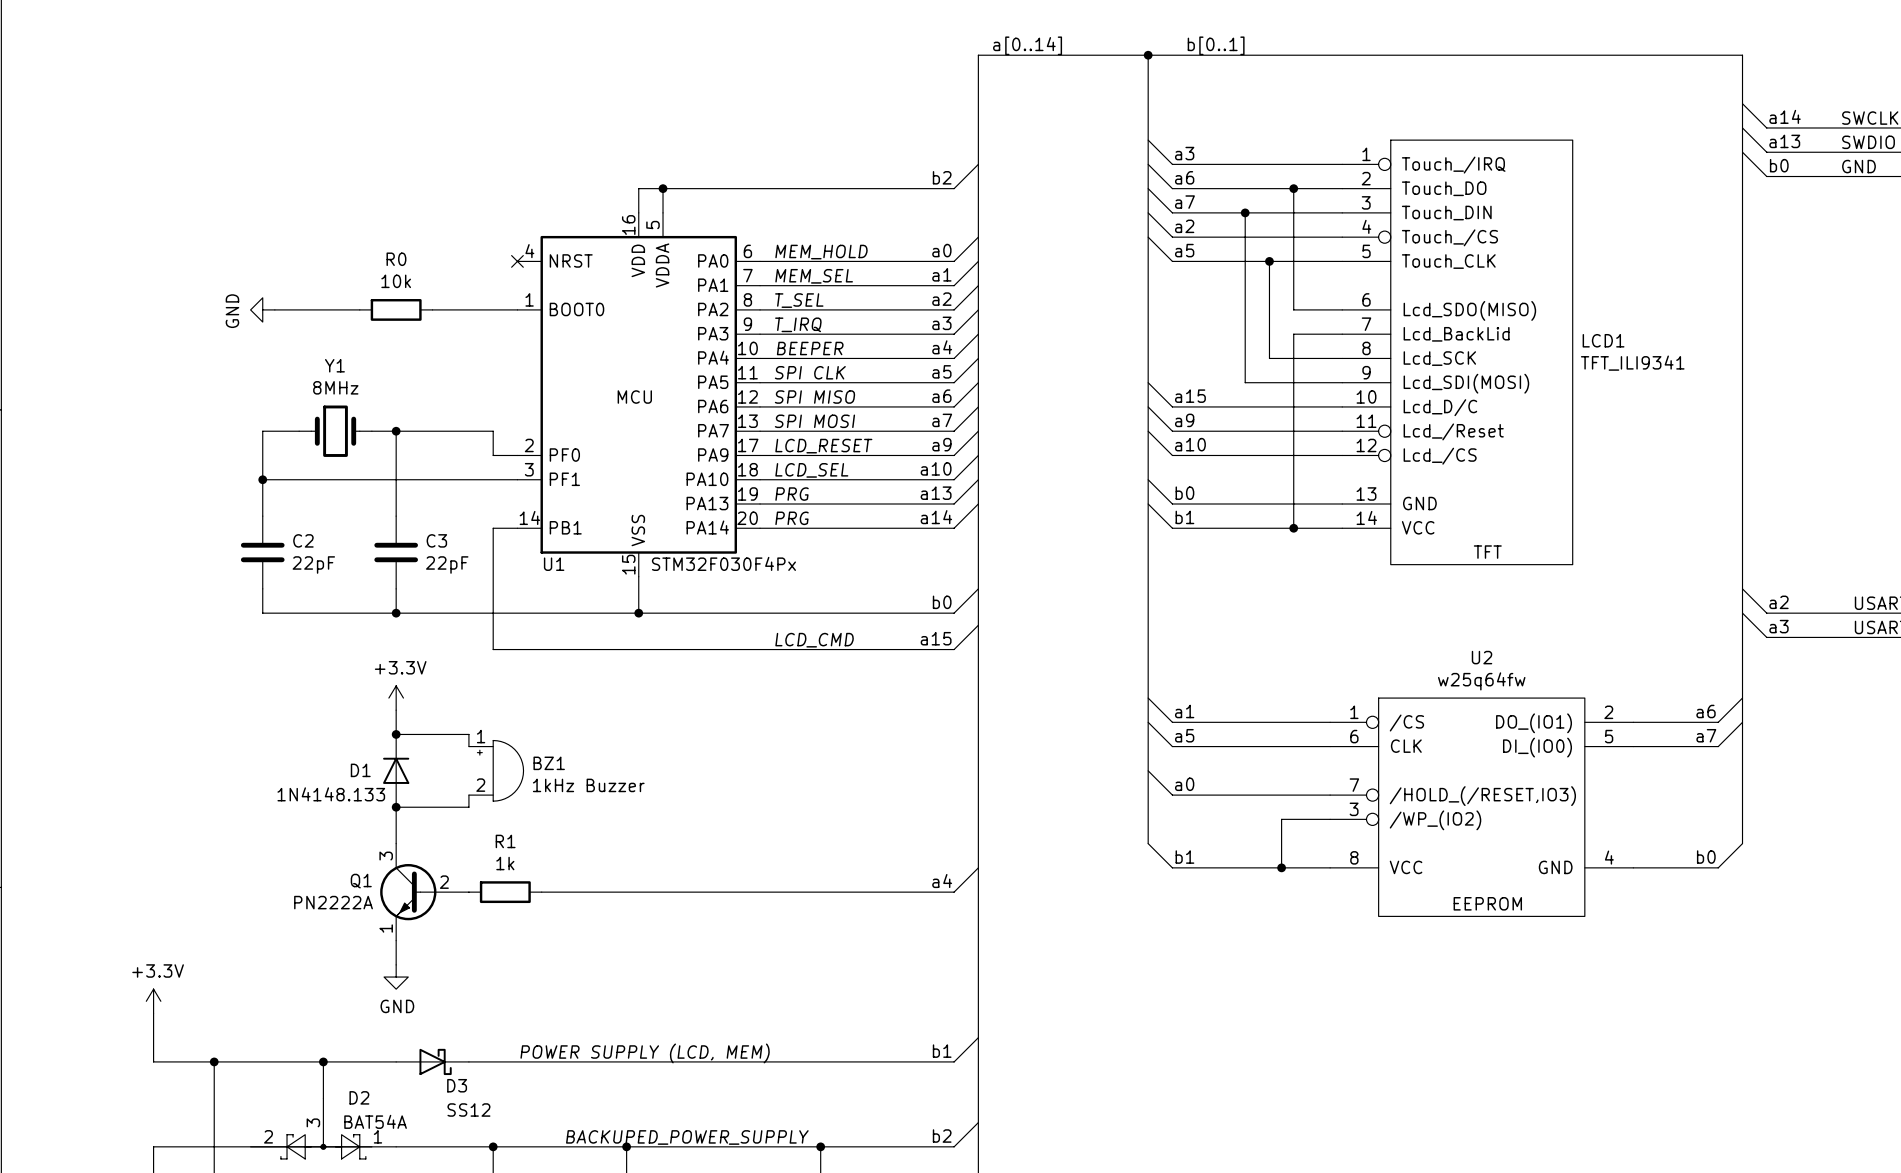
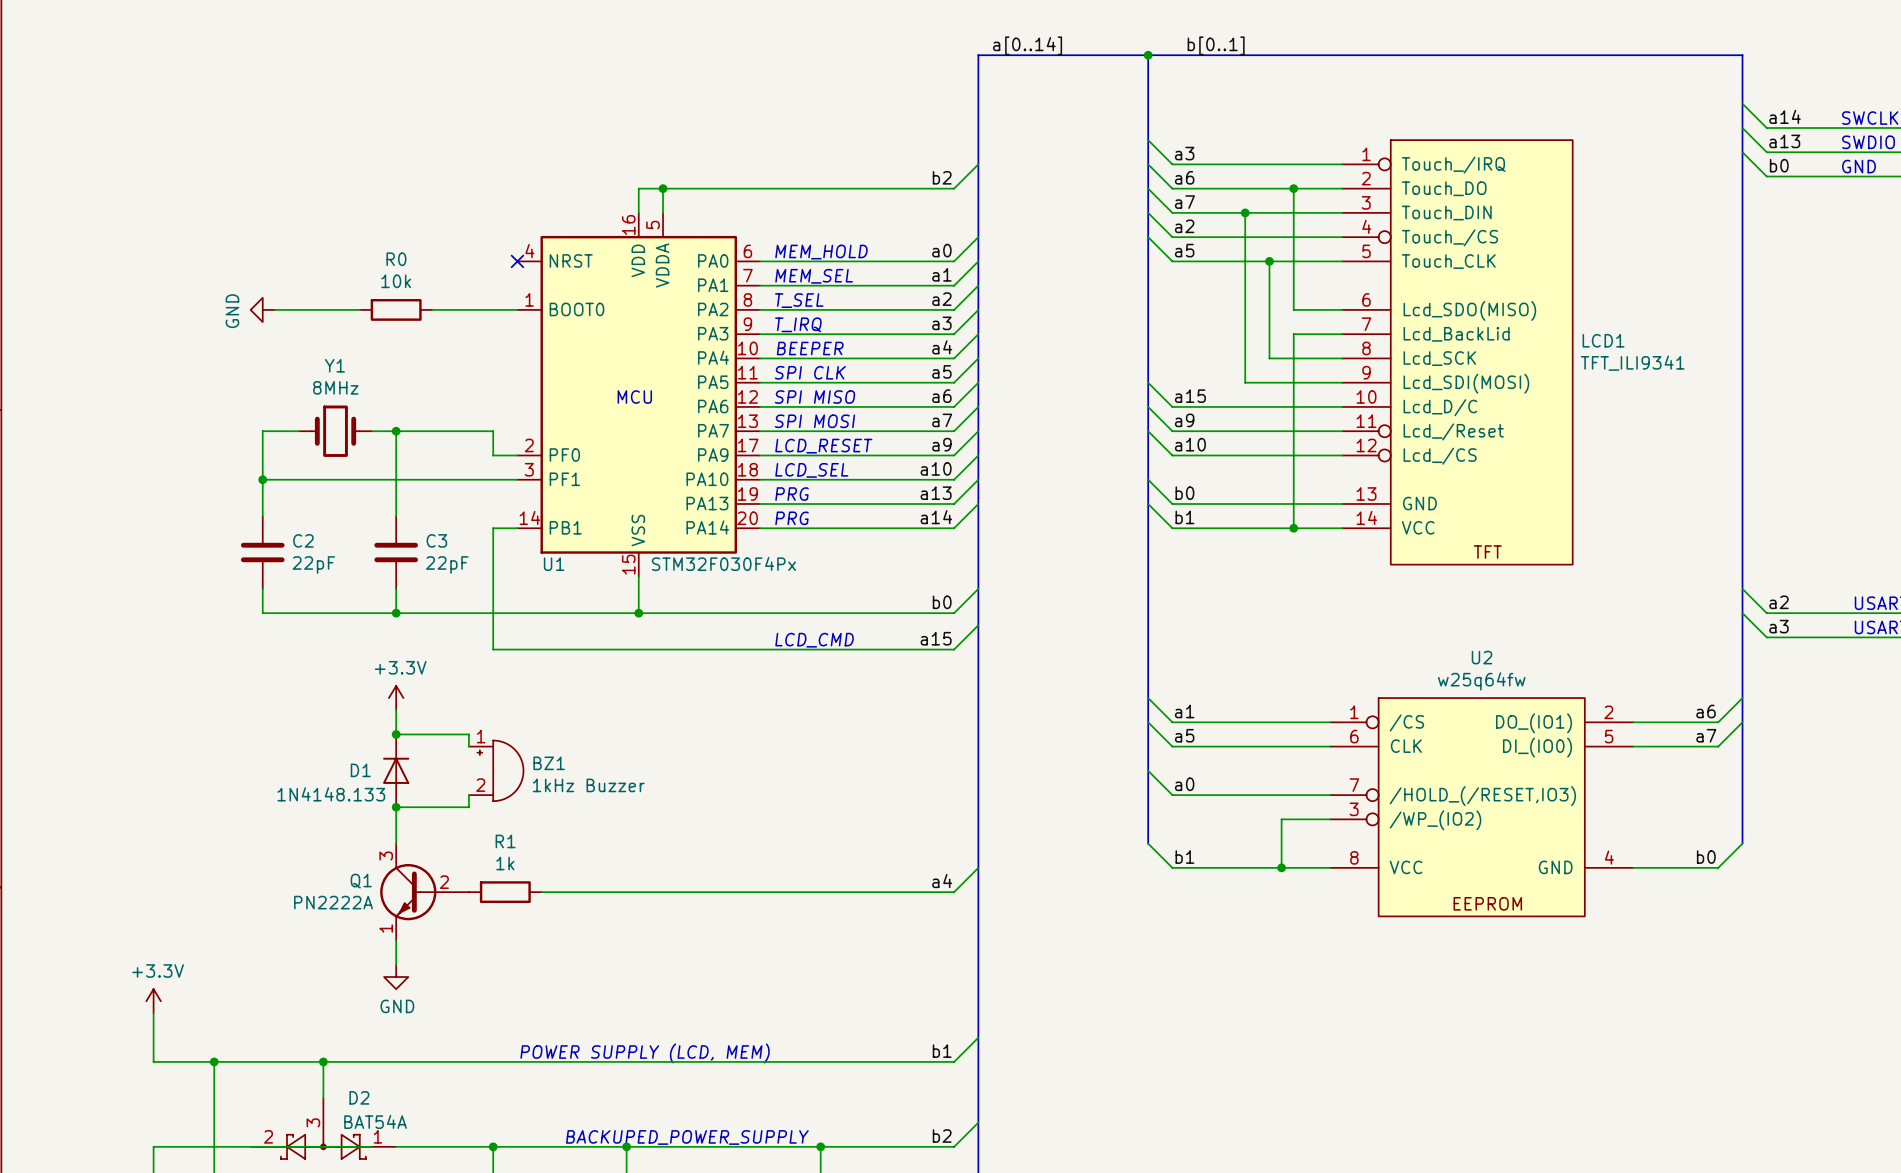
D3: SS12 (432, 1061) -> none

